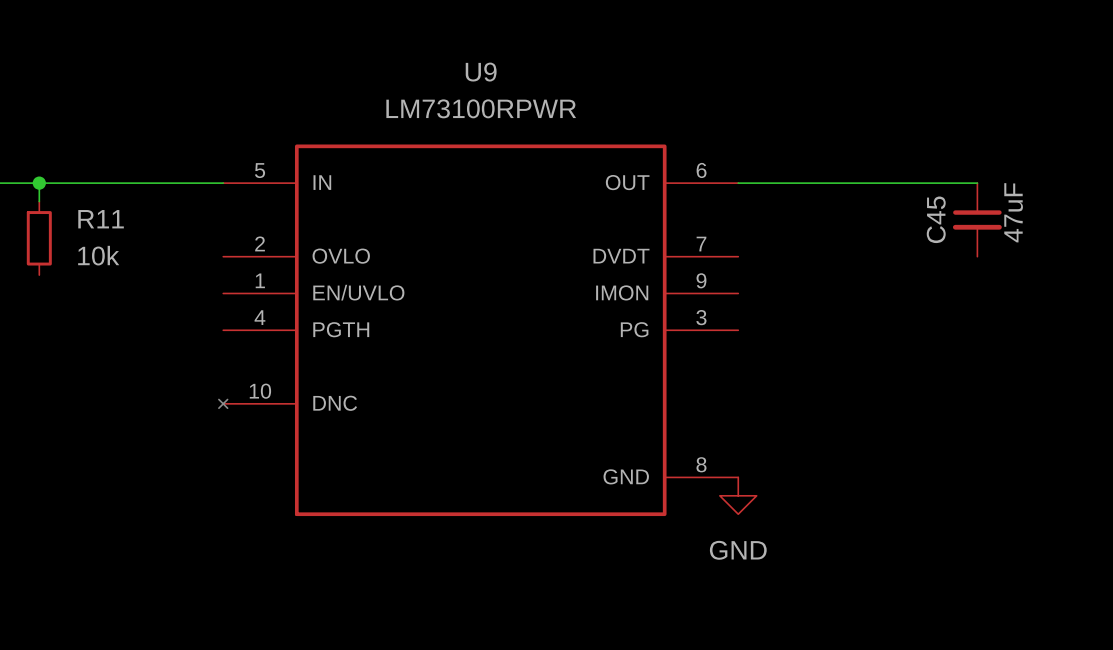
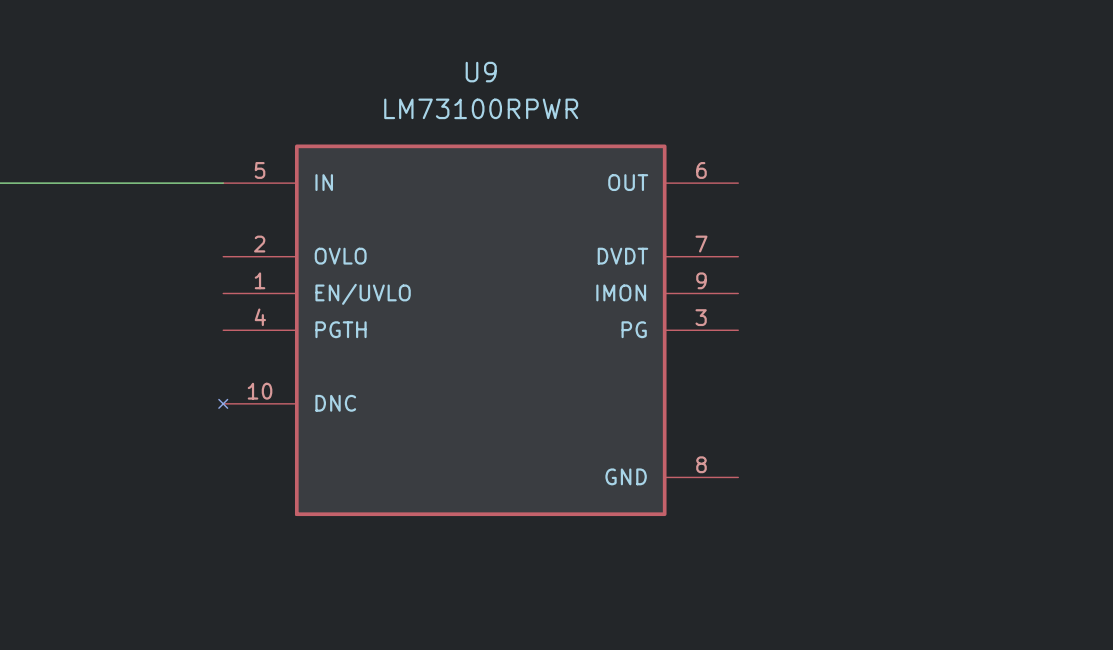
wire: (39, 183) (39, 201) -> none
junction: (39, 183) -> none
wire: (738, 183) (977, 183) -> none
C45: 47uF (977, 219) -> none
R11: 10k (39, 238) -> none
power symbol: GND (738, 495) -> none

